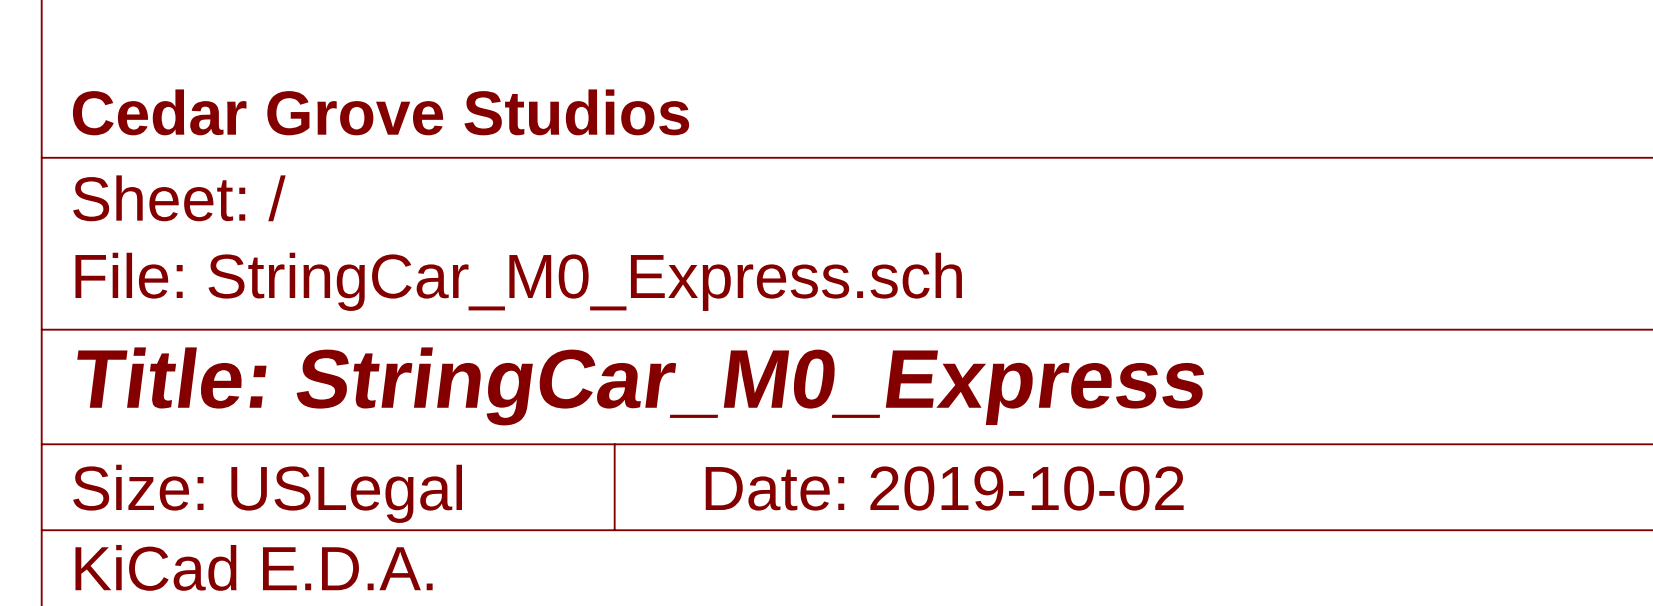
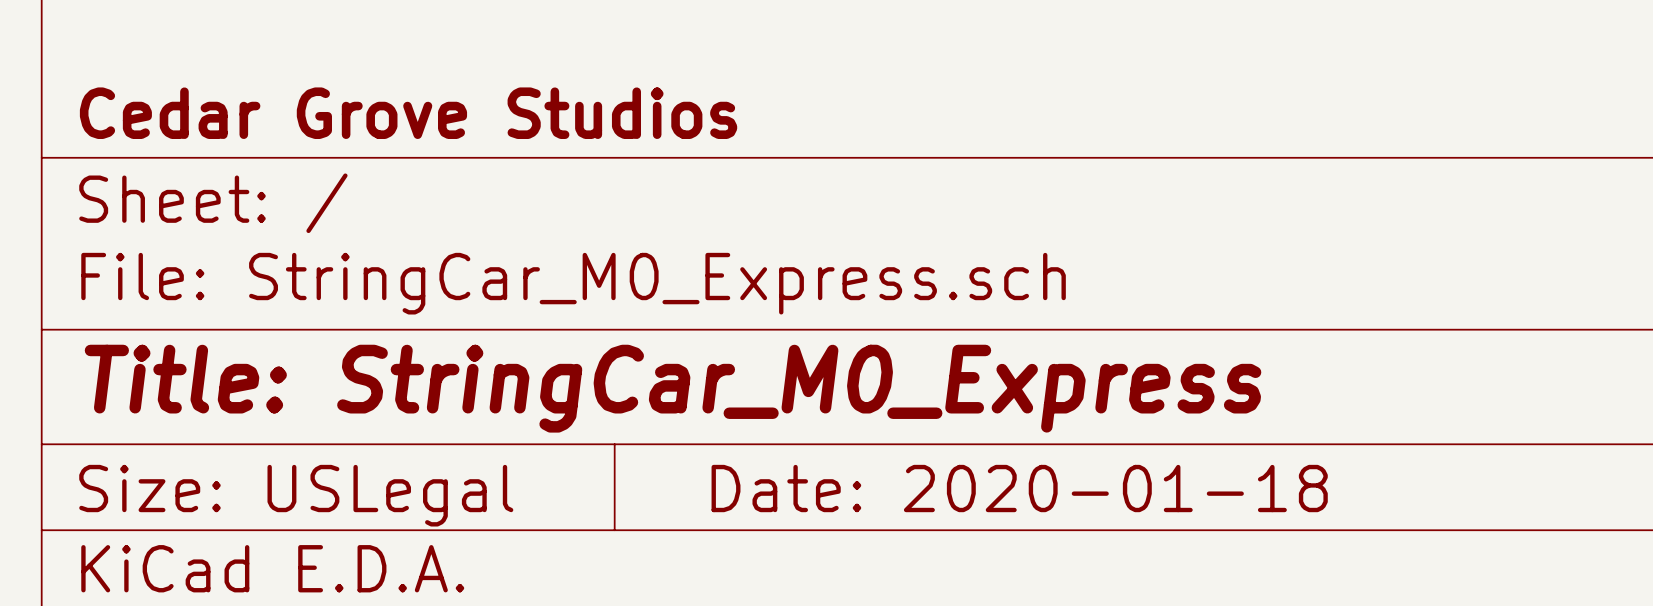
title block: Date: 2019-10-02 (944, 488) -> Date: 2020-01-18 (1019, 488)

